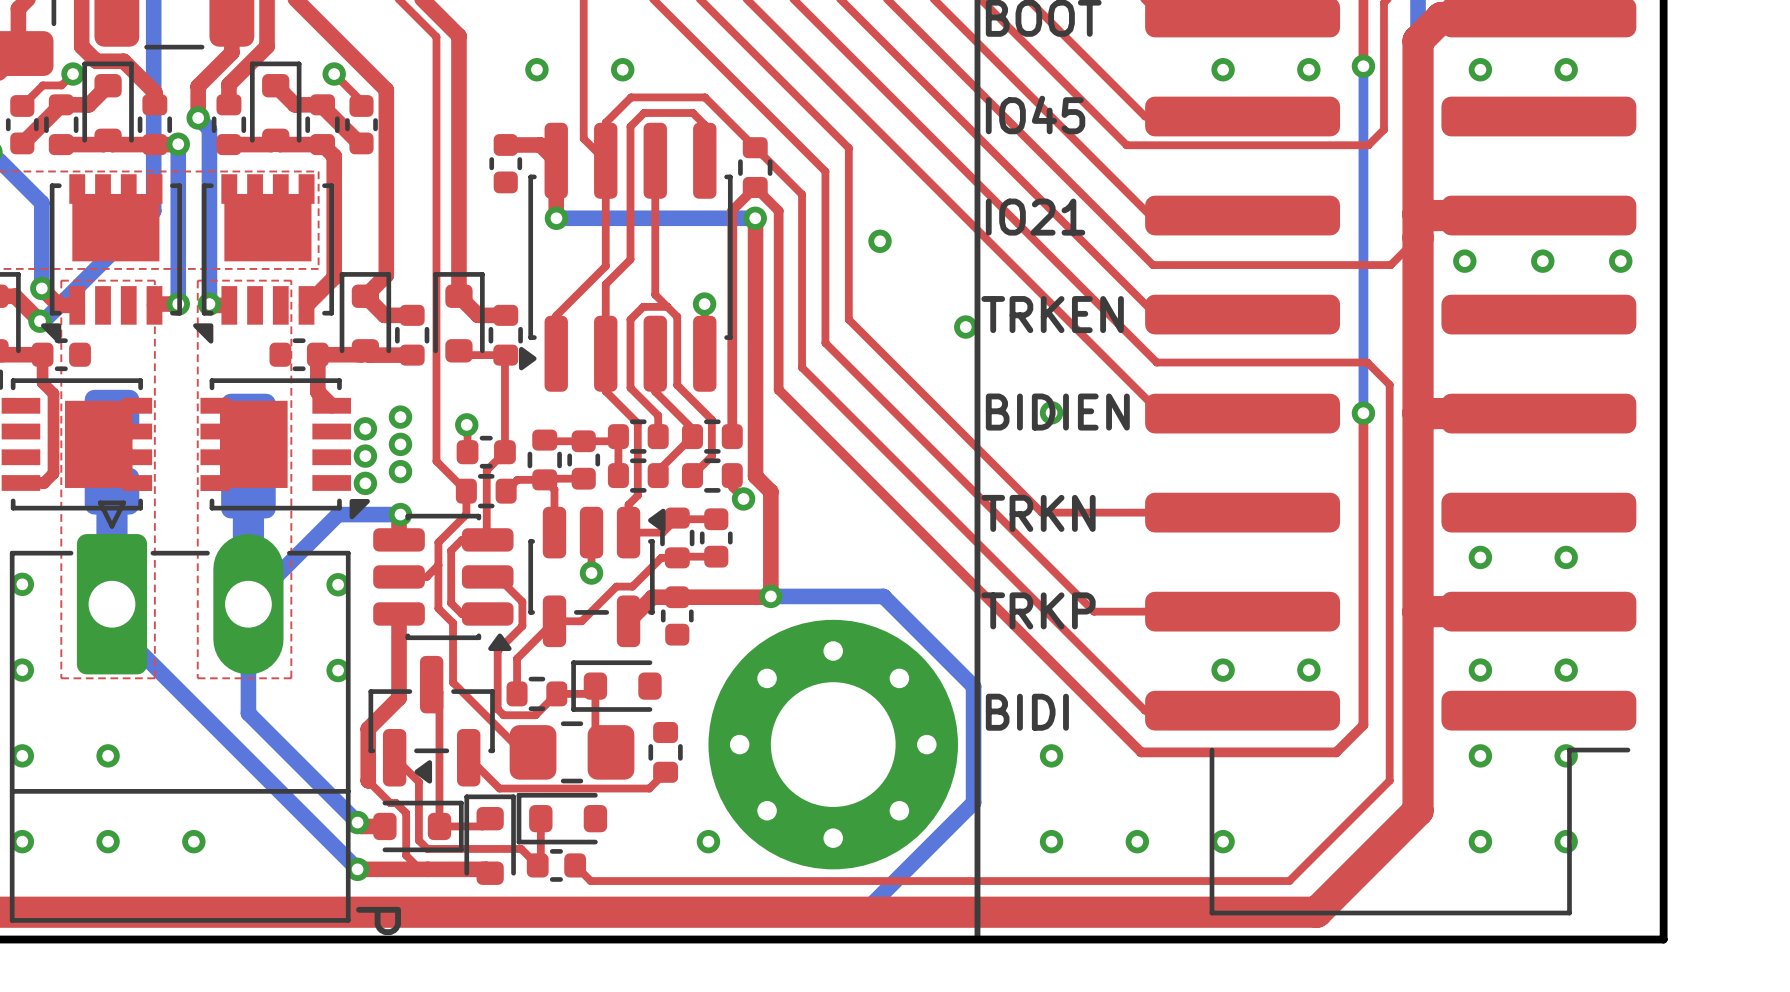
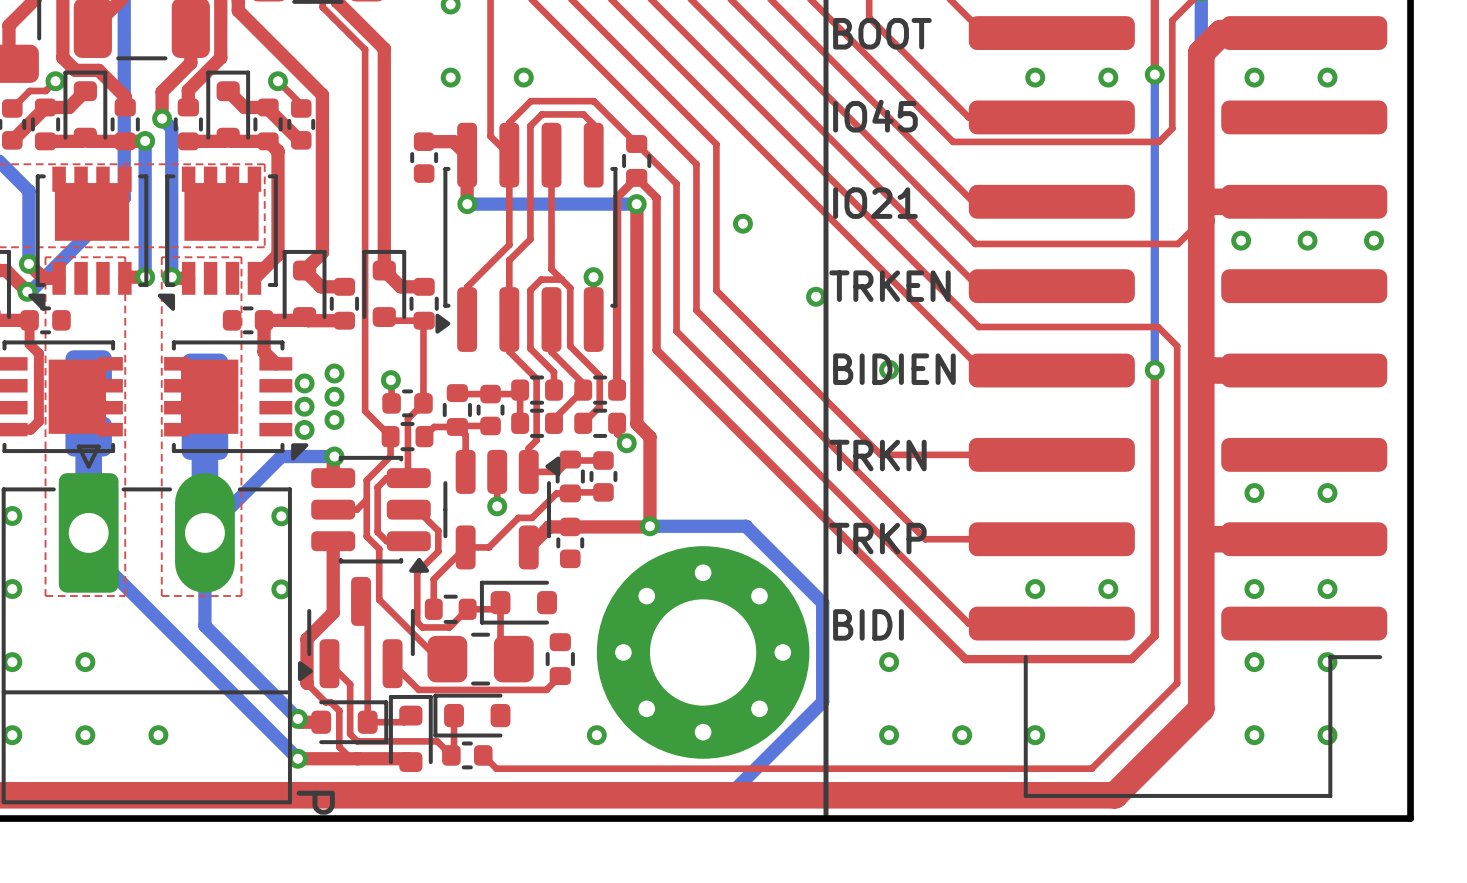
part footprint: [528, 506, 666, 648] -> [443, 449, 561, 570]
part footprint: [368, 655, 495, 787] -> [297, 576, 415, 689]

